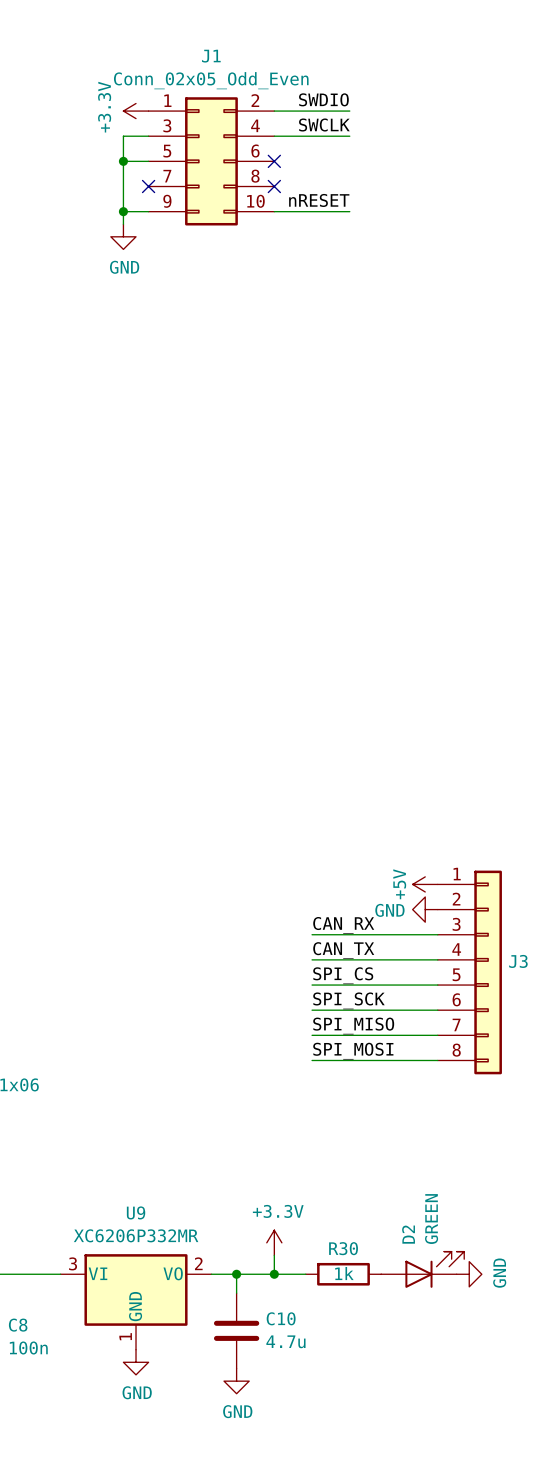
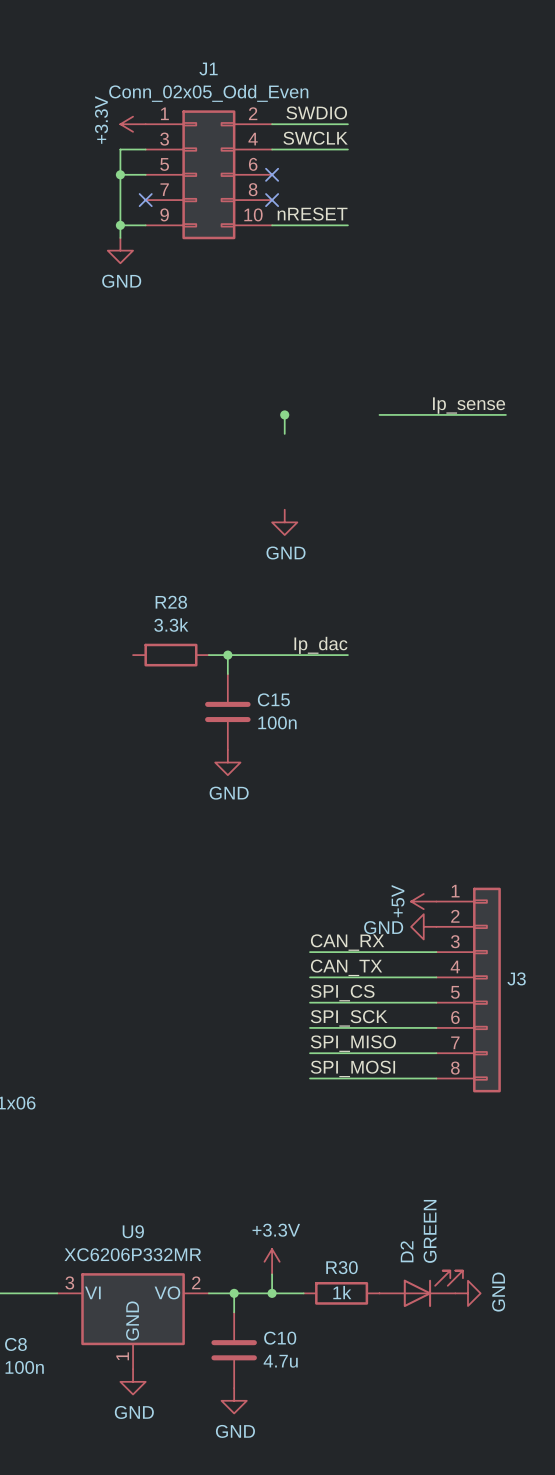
label: none -> Ip_sense (469, 405)
wire: none -> (284, 414) (284, 433)
junction: none -> (284, 414)
wire: none -> (379, 414) (505, 414)
power symbol: none -> GND (284, 522)
label: none -> Ip_dac (320, 645)
R28: none -> 3.3k (170, 655)
wire: none -> (208, 655) (347, 655)
wire: none -> (227, 655) (227, 674)
junction: none -> (227, 655)
C15: none -> 100n (227, 711)
power symbol: none -> GND (227, 762)

